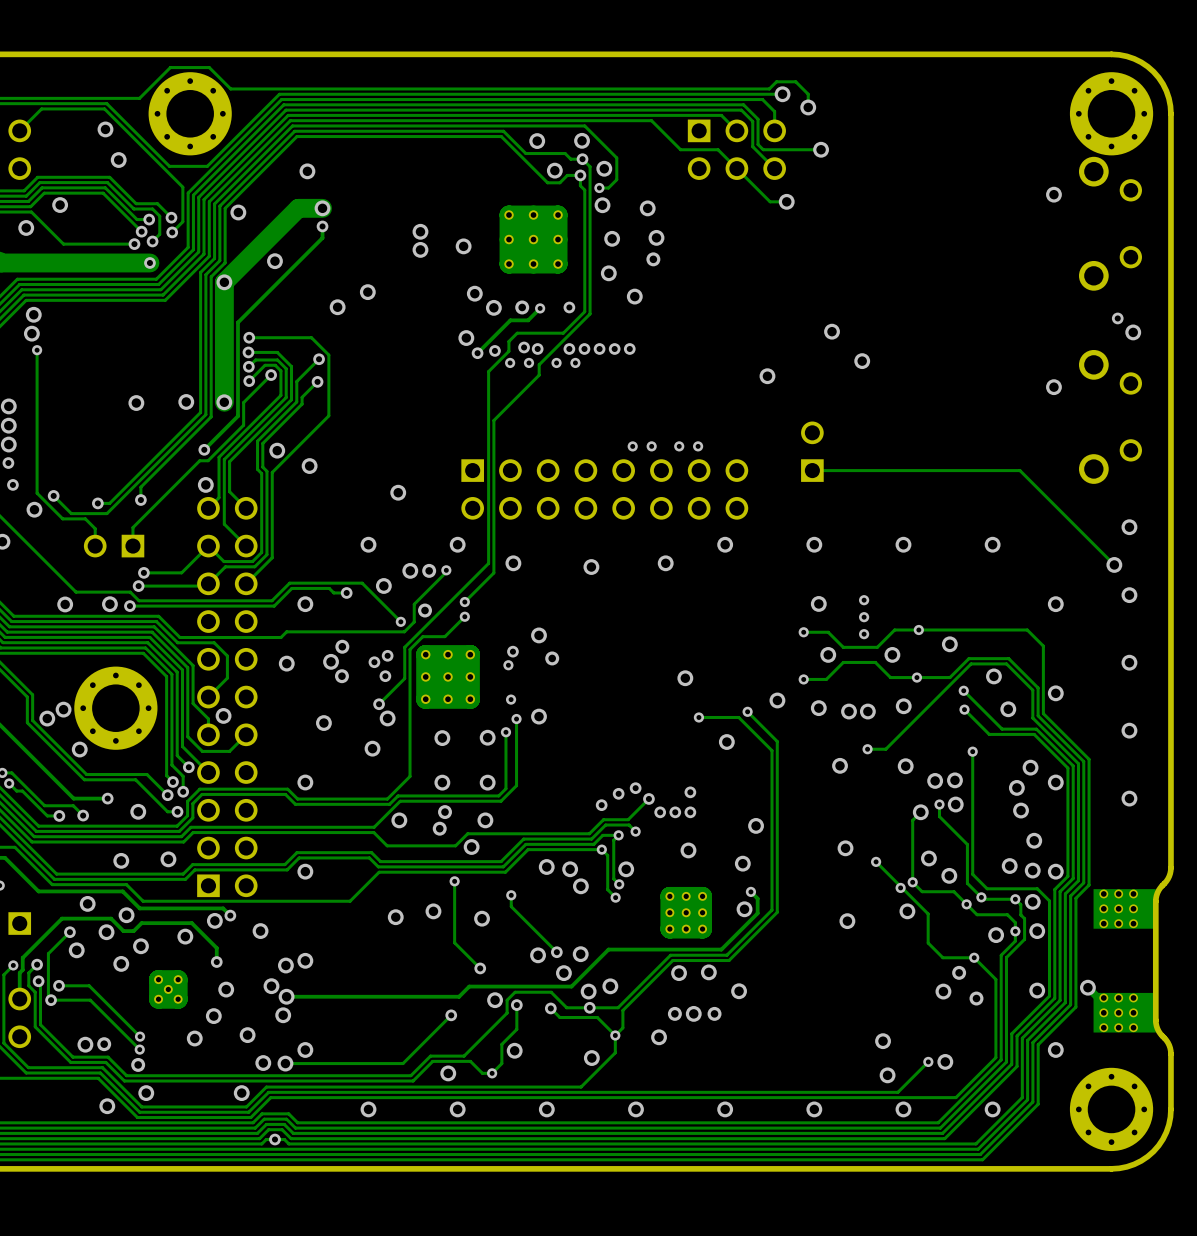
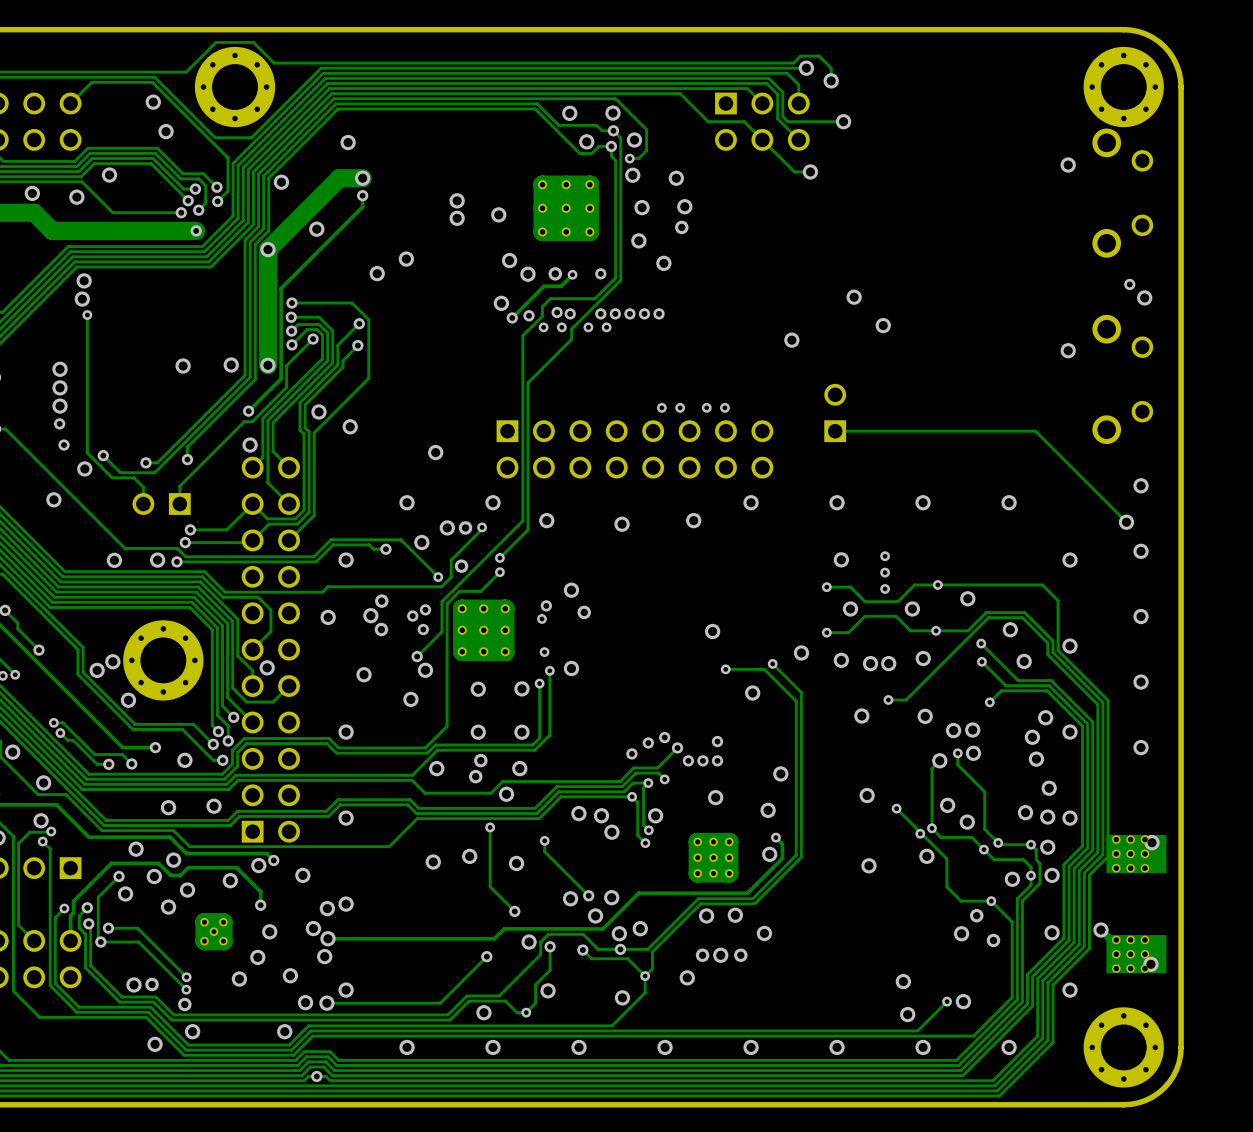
track: (1043, 697) (1043, 713) (1089, 759) (1089, 885) (1075, 898) (1075, 930) -> (1058, 650) (1107, 700) (1107, 856) (1089, 875)
track: (1038, 699) (1038, 715) (1083, 761) (1083, 882) (1070, 896) (1070, 928) -> (1052, 652) (1102, 702) (1102, 854) (1084, 873)
track: (1032, 702) (1032, 718) (1078, 763) (1078, 880) (1065, 893) (1065, 926) -> (1047, 654) (1097, 704) (1097, 852) (1079, 870)
track: (972, 751) (972, 874) (987, 888) (1037, 888) (1049, 900) (1049, 919) -> (989, 702) (1001, 690) (1047, 690) (1082, 726) (1082, 845) (1063, 864)
track: (1073, 765) (1073, 878) (1060, 891) (1060, 924) -> (1086, 716) (1092, 721) (1092, 850) (1074, 868)
track: (1067, 768) (1067, 876) (1054, 889) (1054, 922) -> (1081, 718) (1087, 724) (1087, 848) (1069, 866)
board edge: (1170, 867) (1169, 876) (1158, 890) (1155, 901) (1156, 1023) (1158, 1031) (1169, 1045) (1170, 1053) -> (1181, 814) (1181, 993)
via: none -> (1152, 842)
via: none -> (1150, 964)

